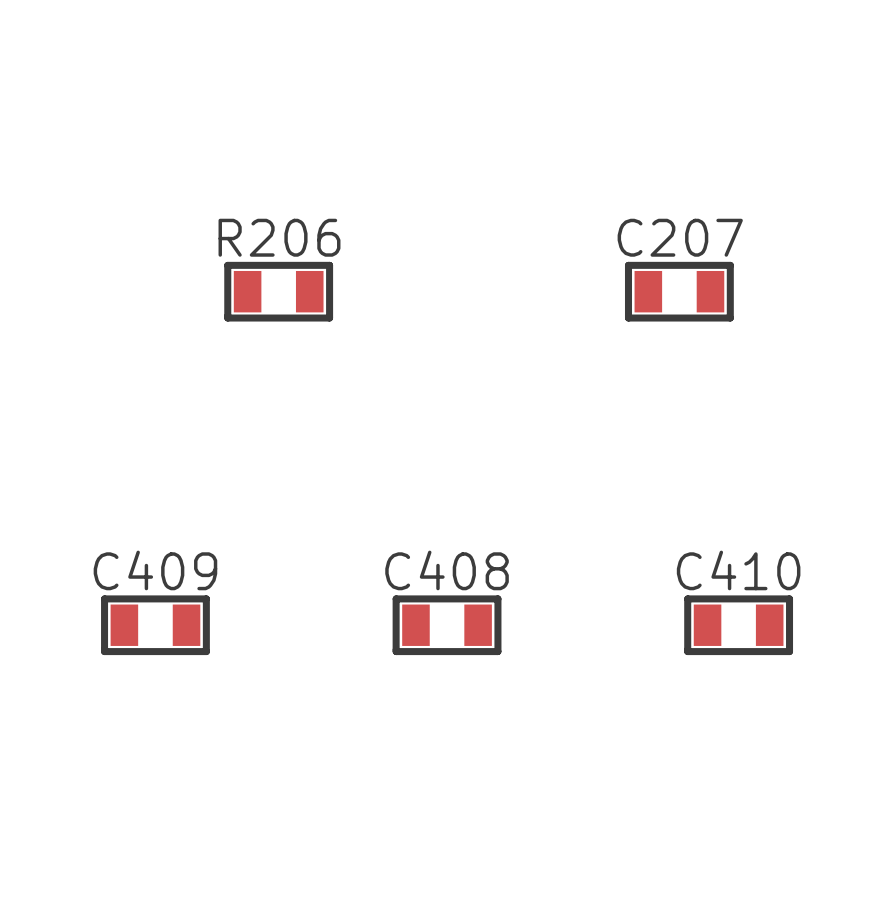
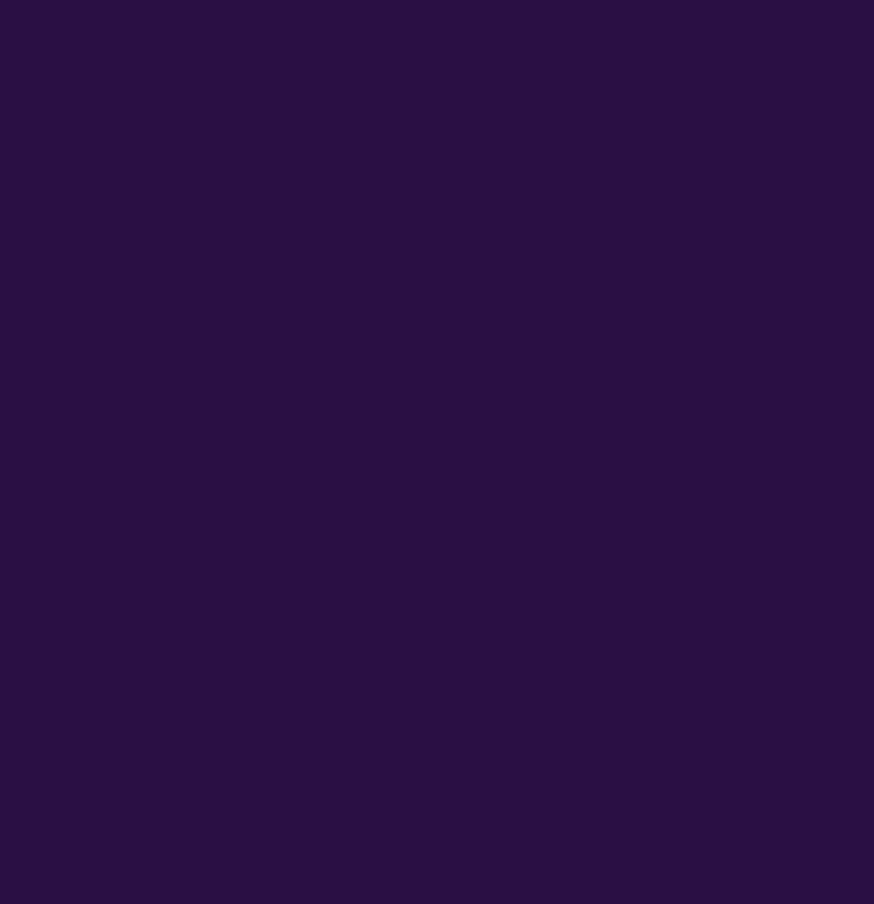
R206: (278, 291) -> none
C207: (679, 291) -> none
C409: (155, 625) -> none
C408: (447, 625) -> none
C410: (738, 625) -> none

